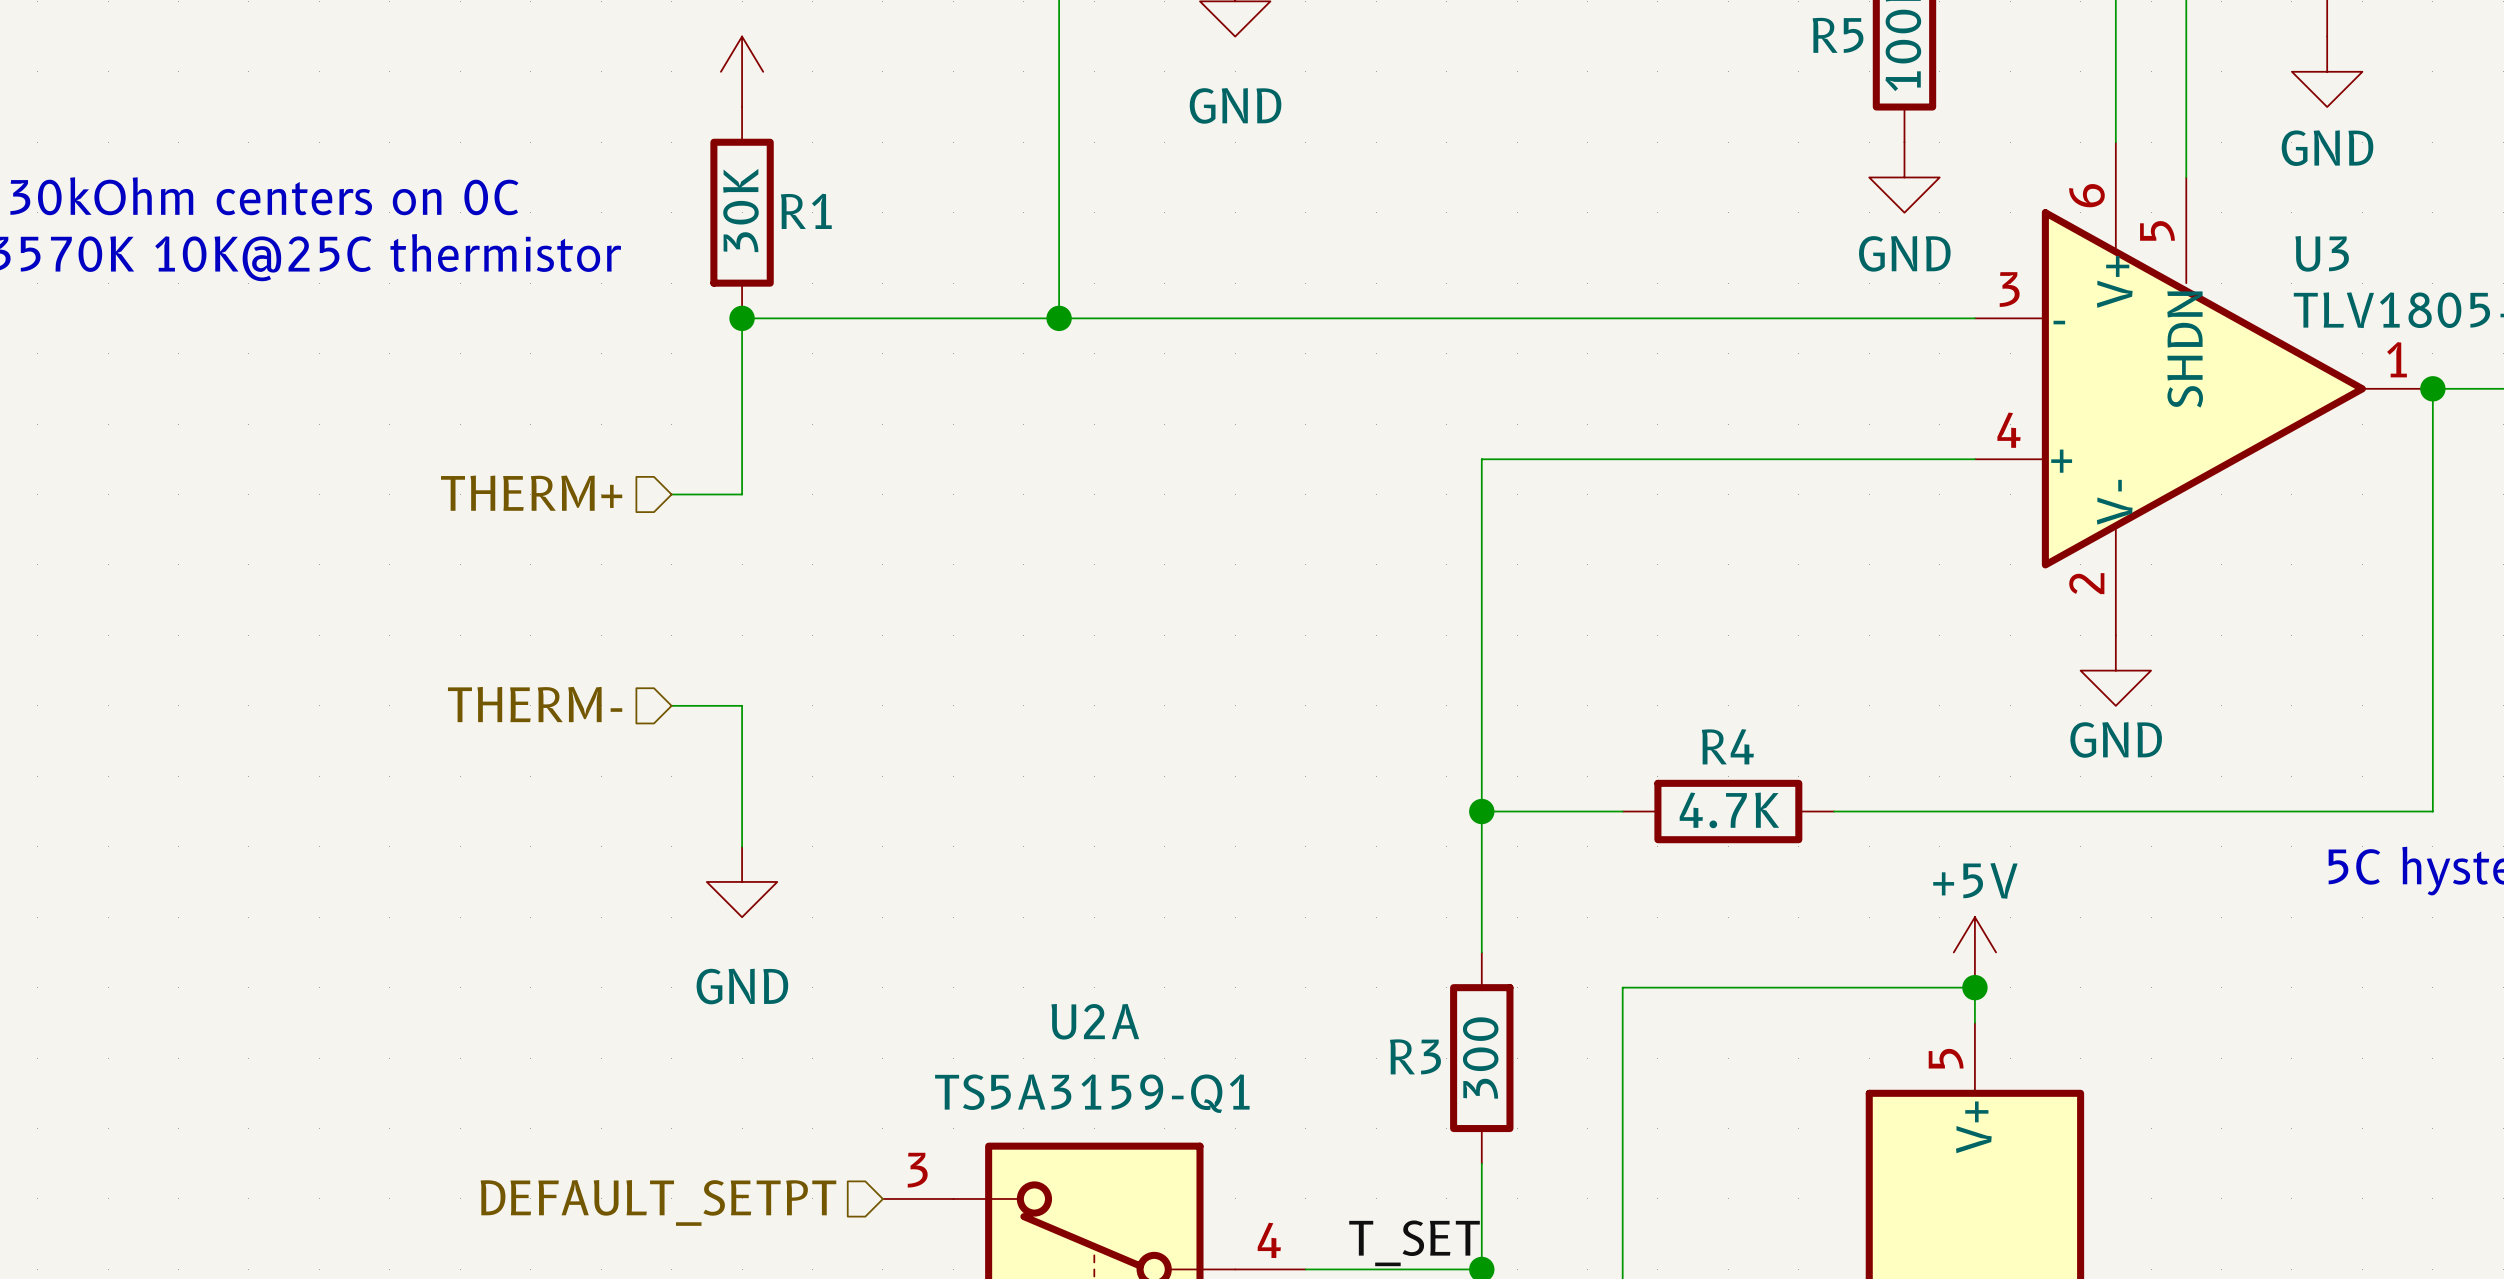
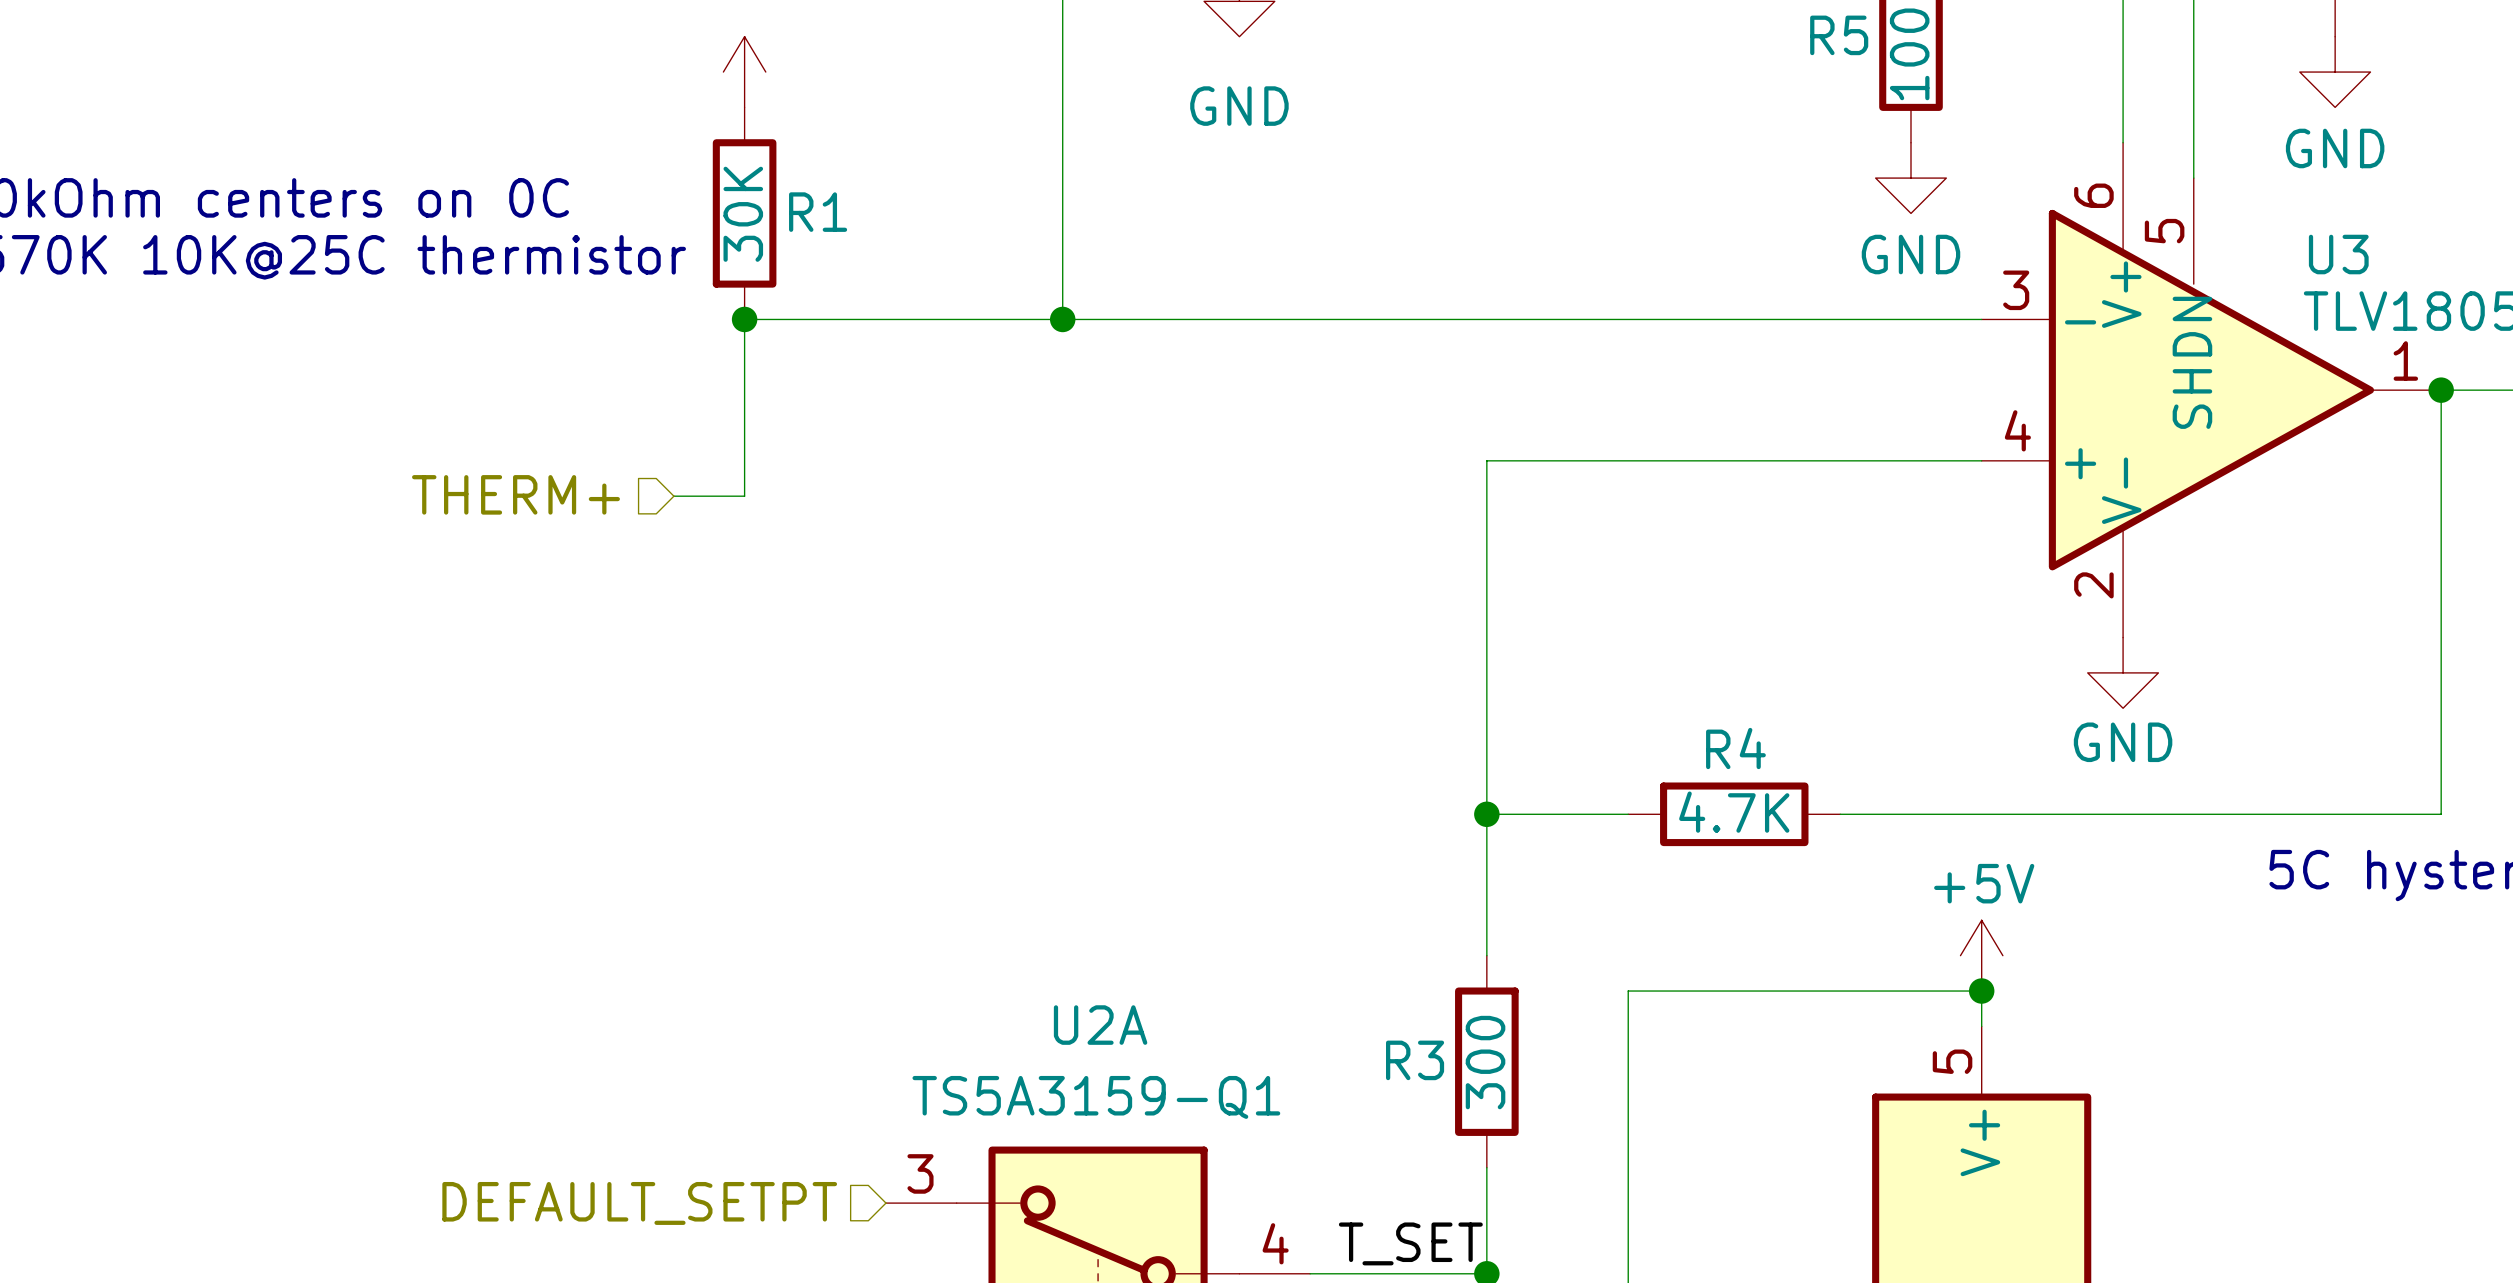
hierarchical label: THERM- (535, 704) -> none
wire: (671, 705) (742, 705) (742, 846) -> none
power symbol: GND (742, 881) -> none

